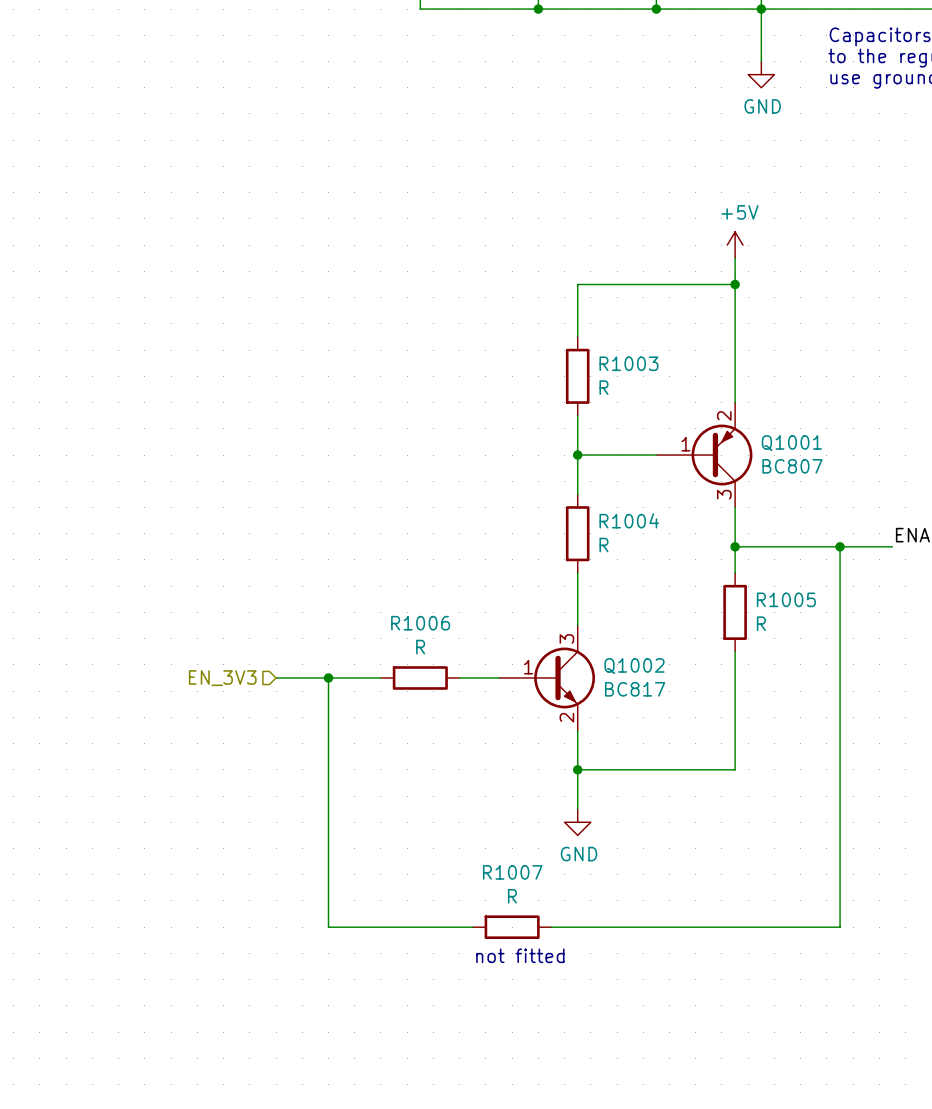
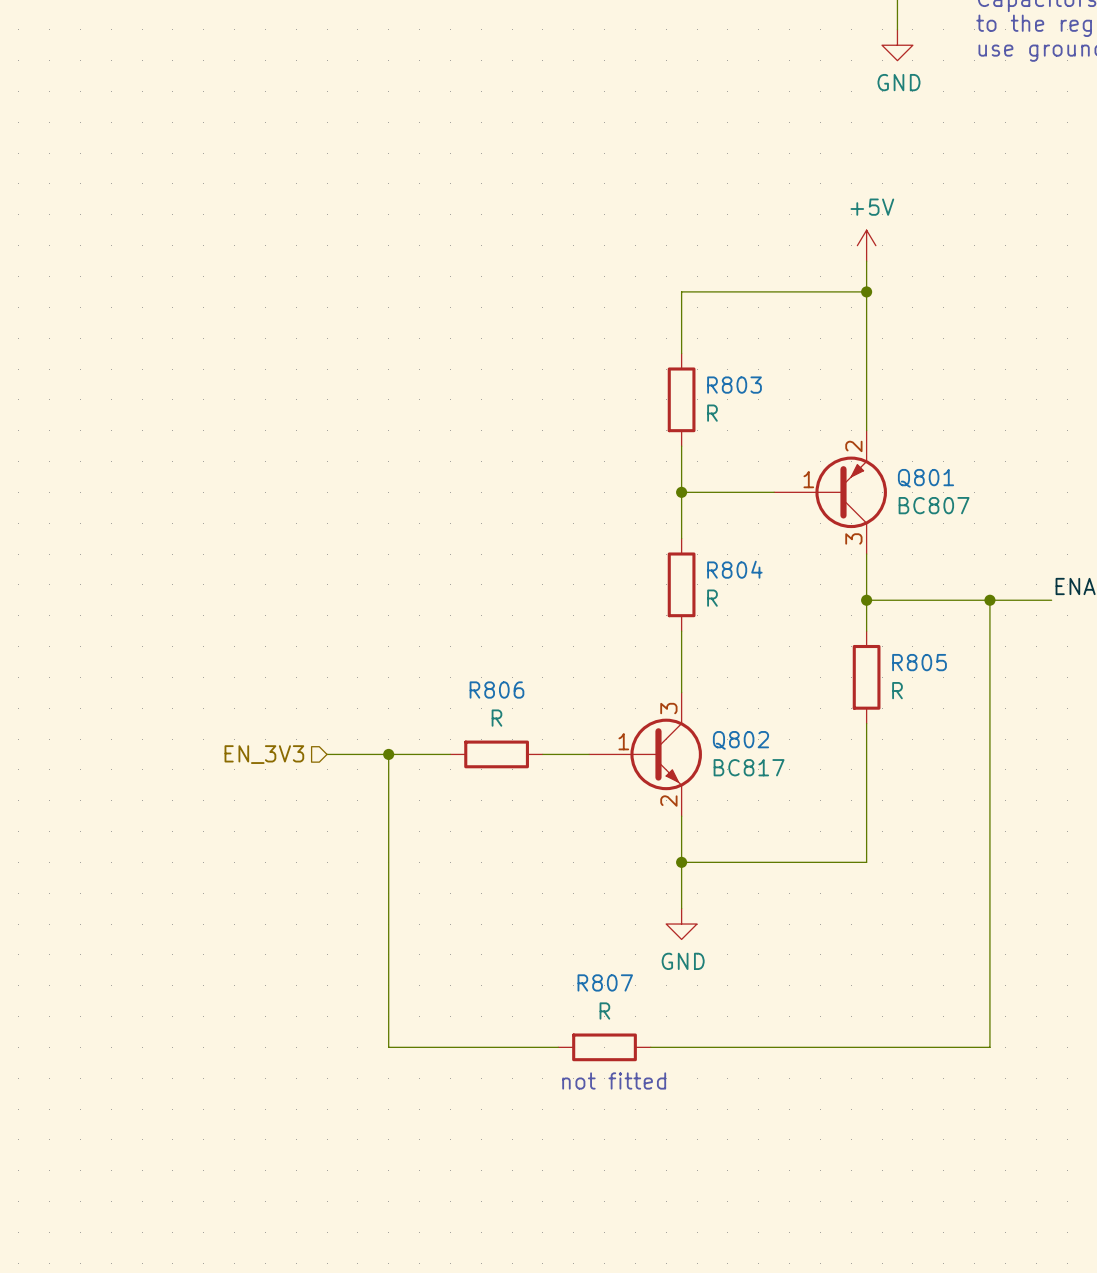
R1003 name: R1003 (628, 363) -> R803 (734, 385)
Q1001 name: Q1001 (791, 443) -> Q801 (925, 478)
R1004 name: R1004 (629, 520) -> R804 (734, 569)
R1005 name: R1005 (786, 599) -> R805 (919, 662)
R1006 name: R1006 (420, 623) -> R806 (496, 690)
Q1002 name: Q1002 (634, 666) -> Q802 (740, 740)
R1007 name: R1007 (512, 872) -> R807 (605, 982)

